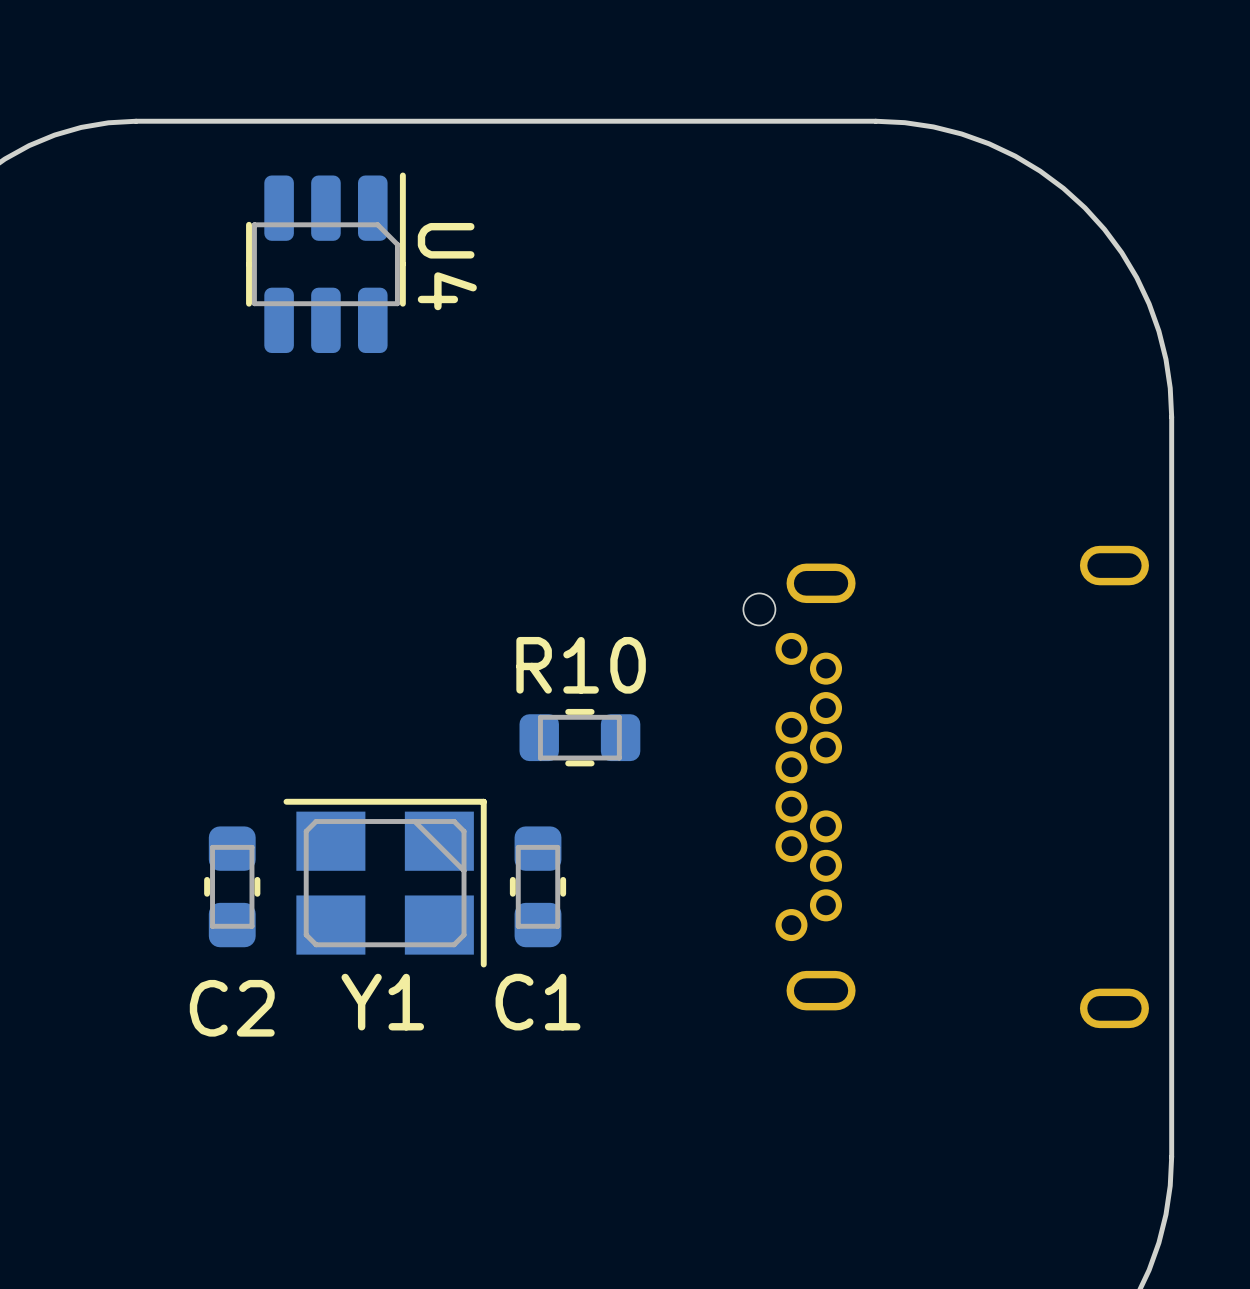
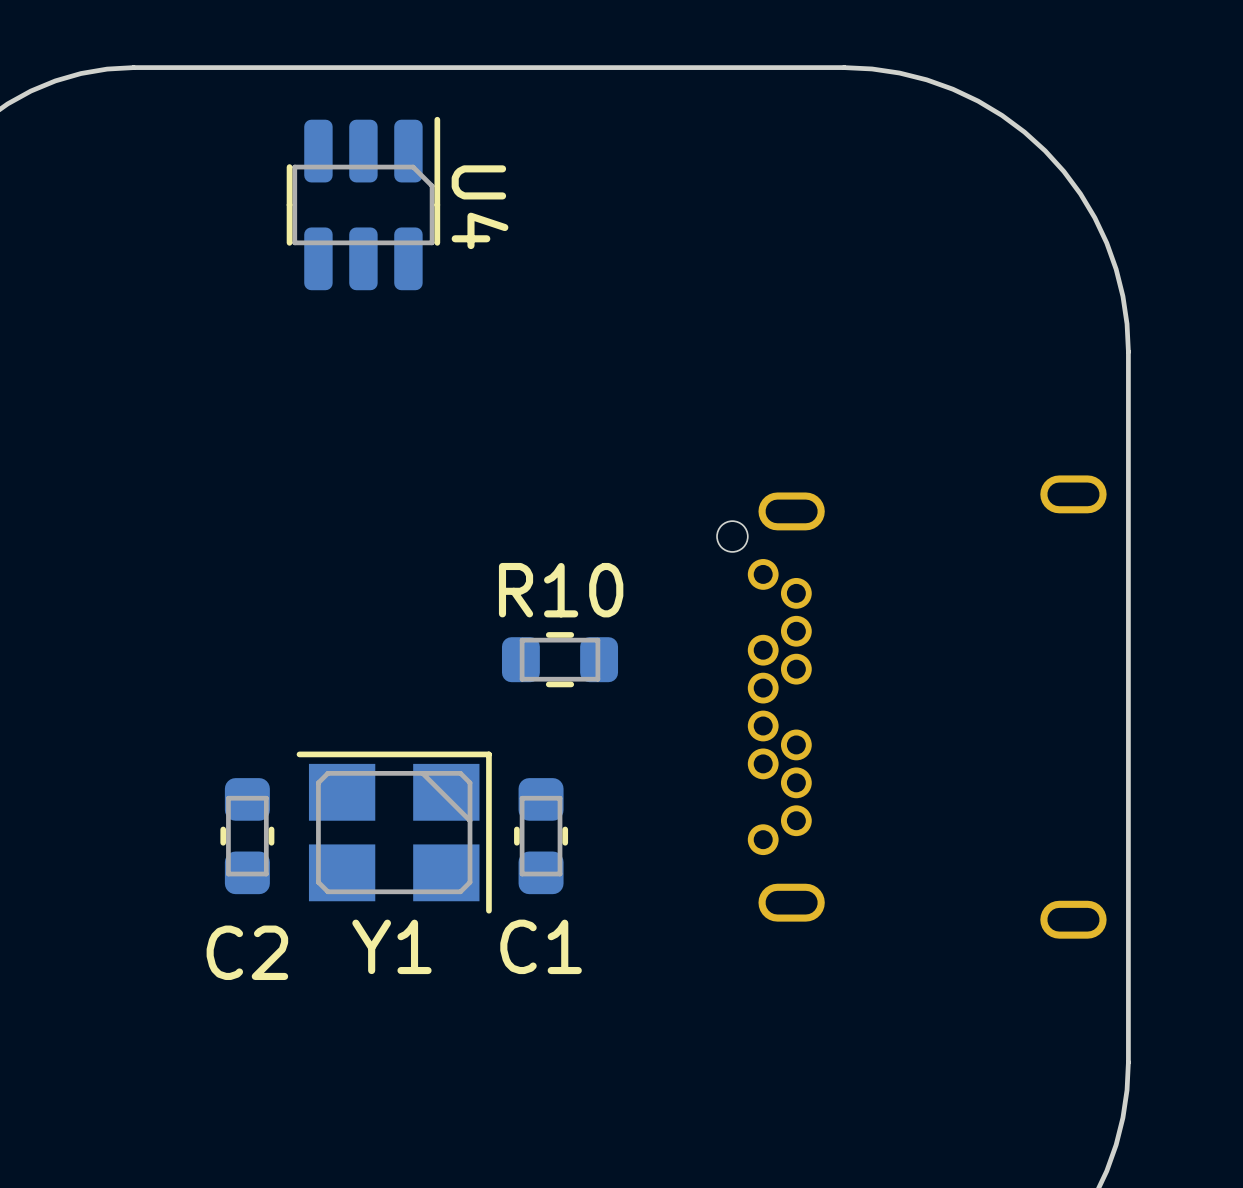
U4 position: (325, 262) -> (363, 203)
Y1 position: (385, 883) -> (394, 832)
C2 position: (232, 886) -> (247, 836)
C1 position: (537, 886) -> (541, 836)

